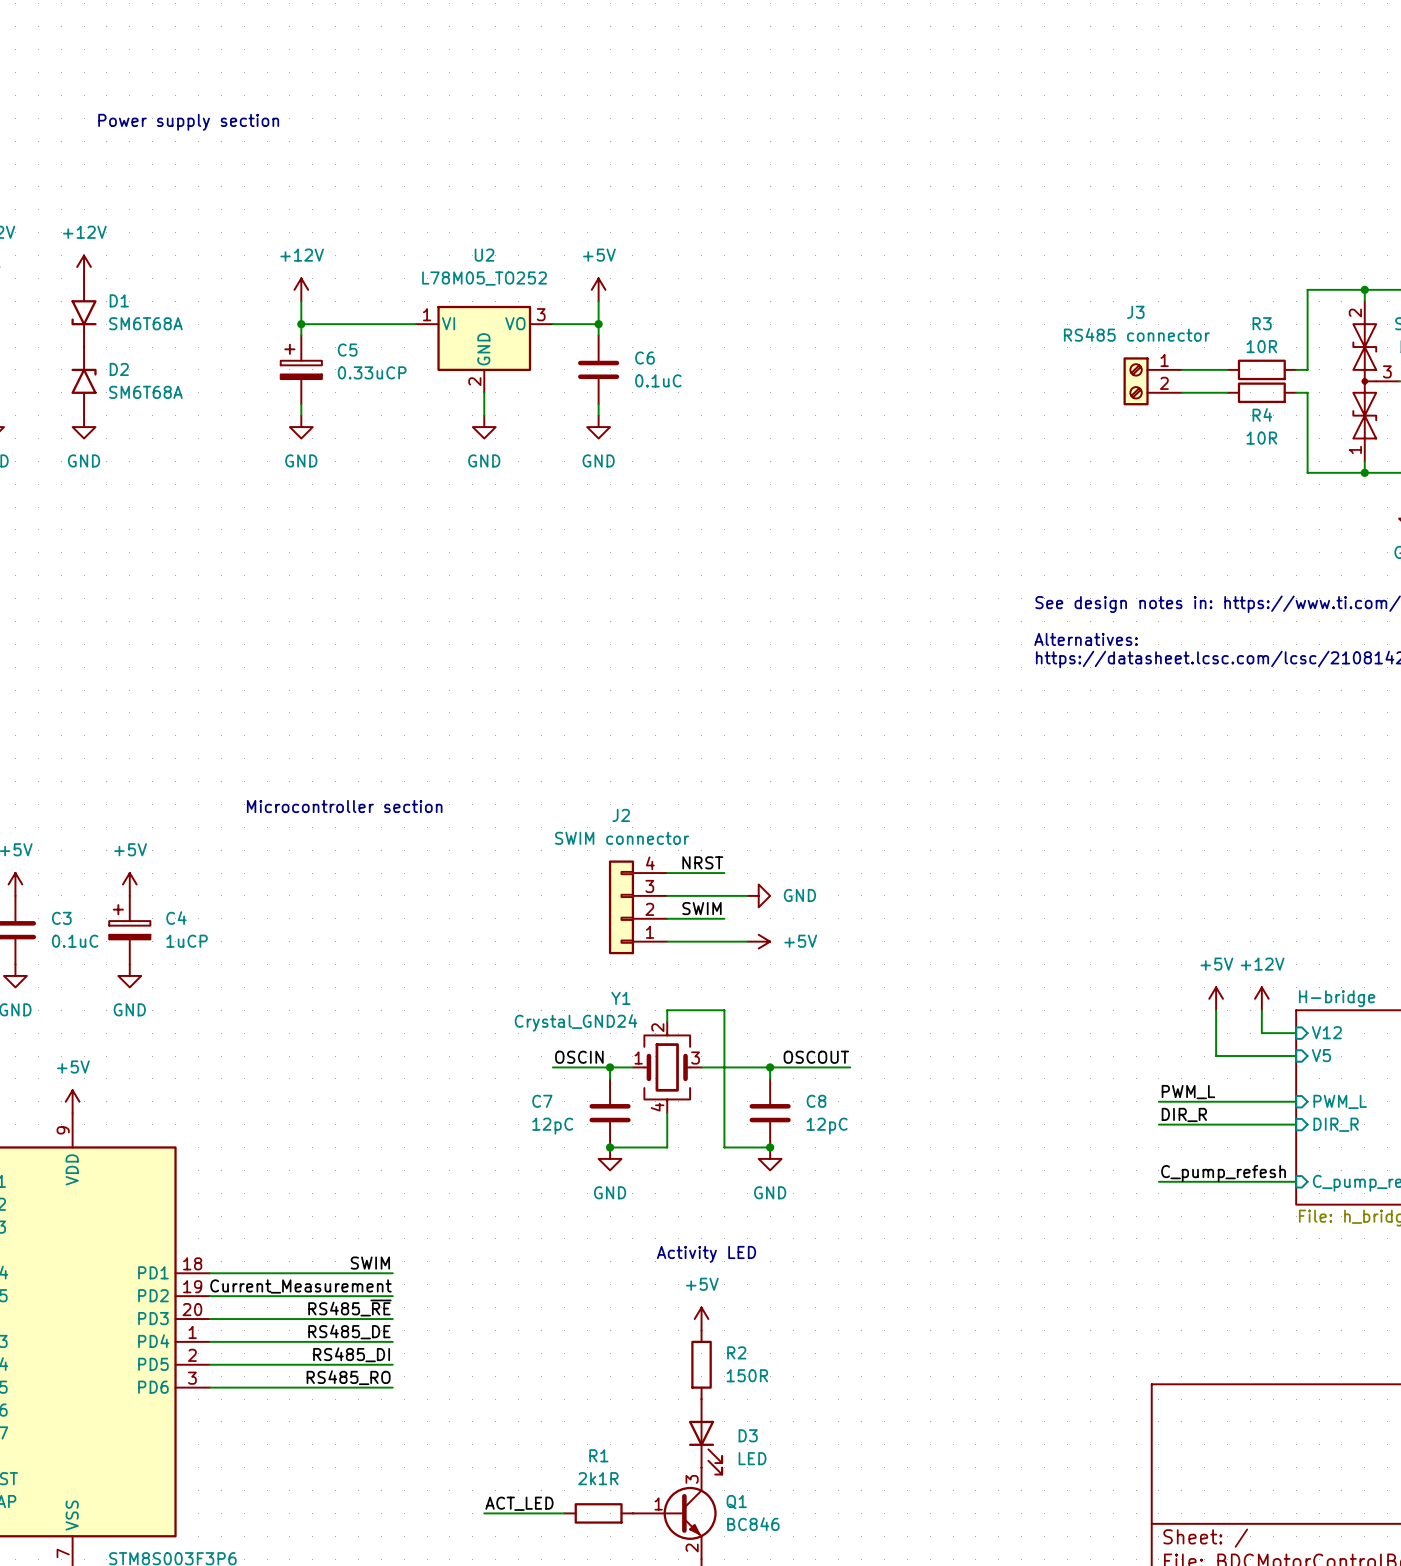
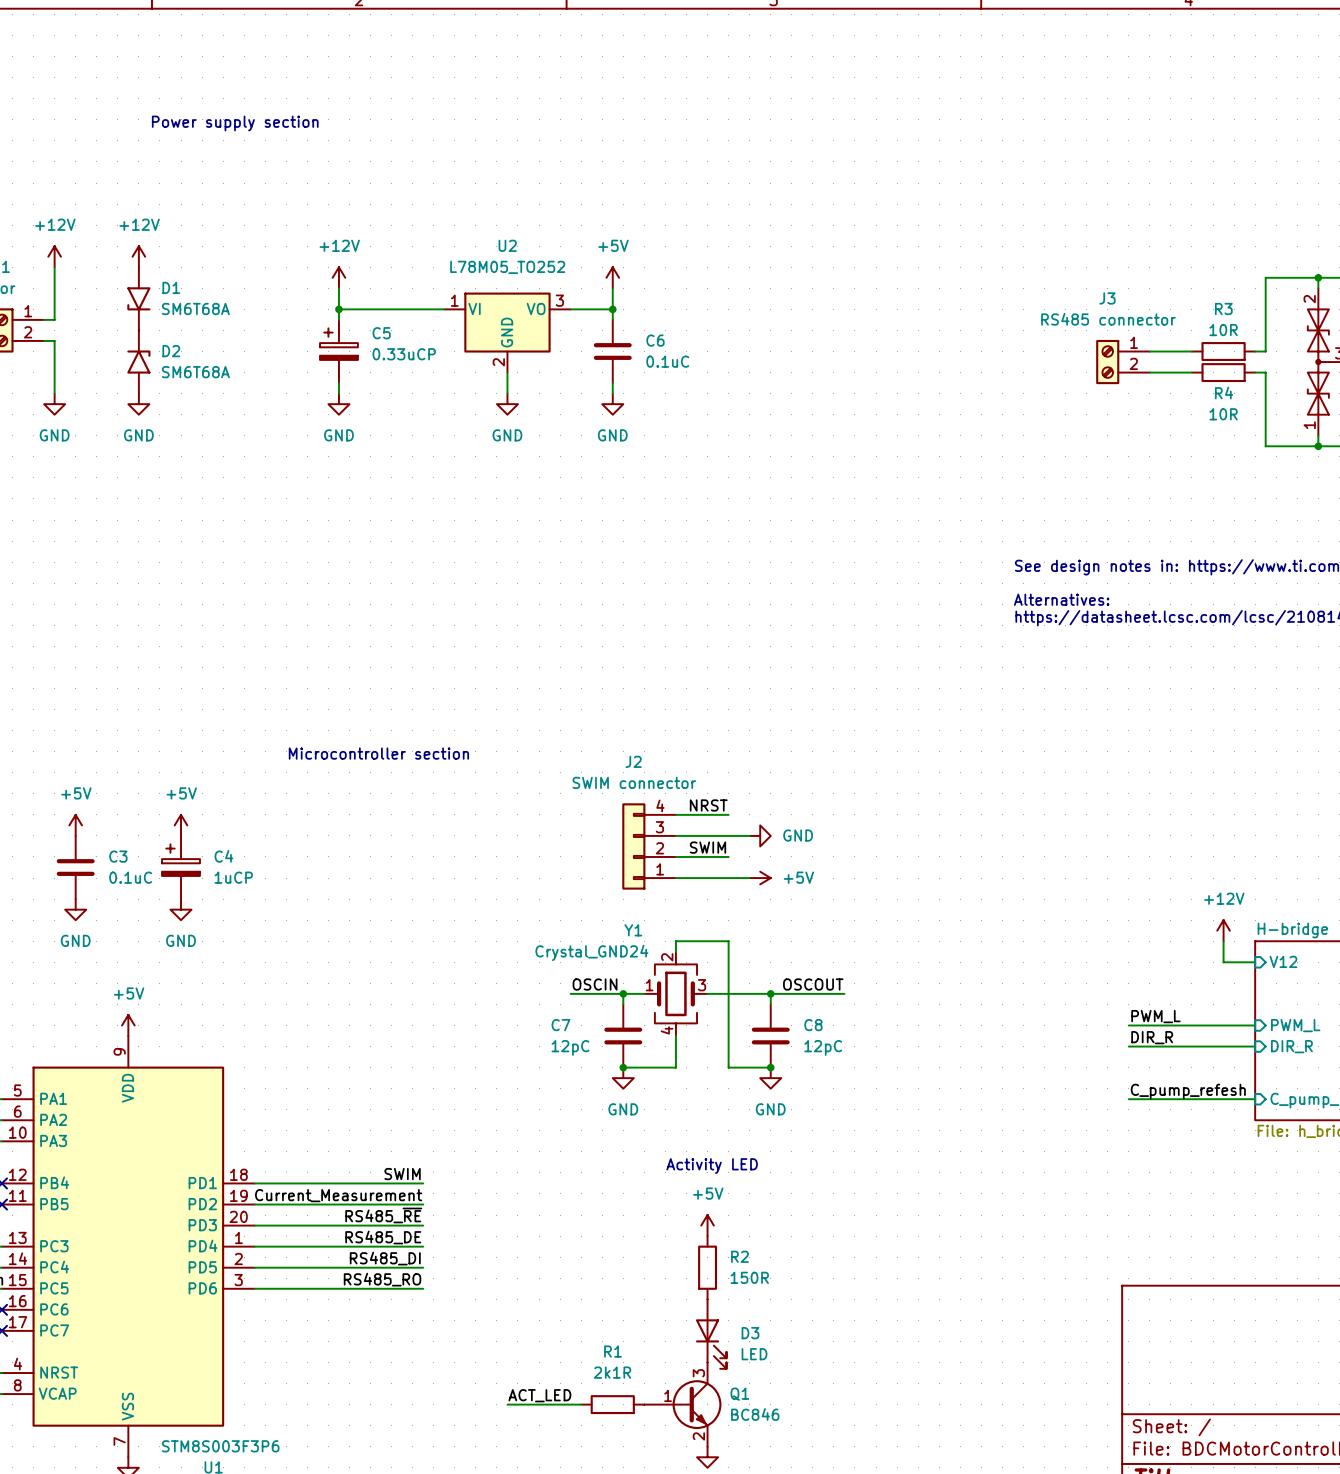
power symbol: +5V (1216, 998) -> none
wire: (1216, 1010) (1216, 1056) (1296, 1056) -> none
sheet pin: V5 (1321, 1055) -> none

